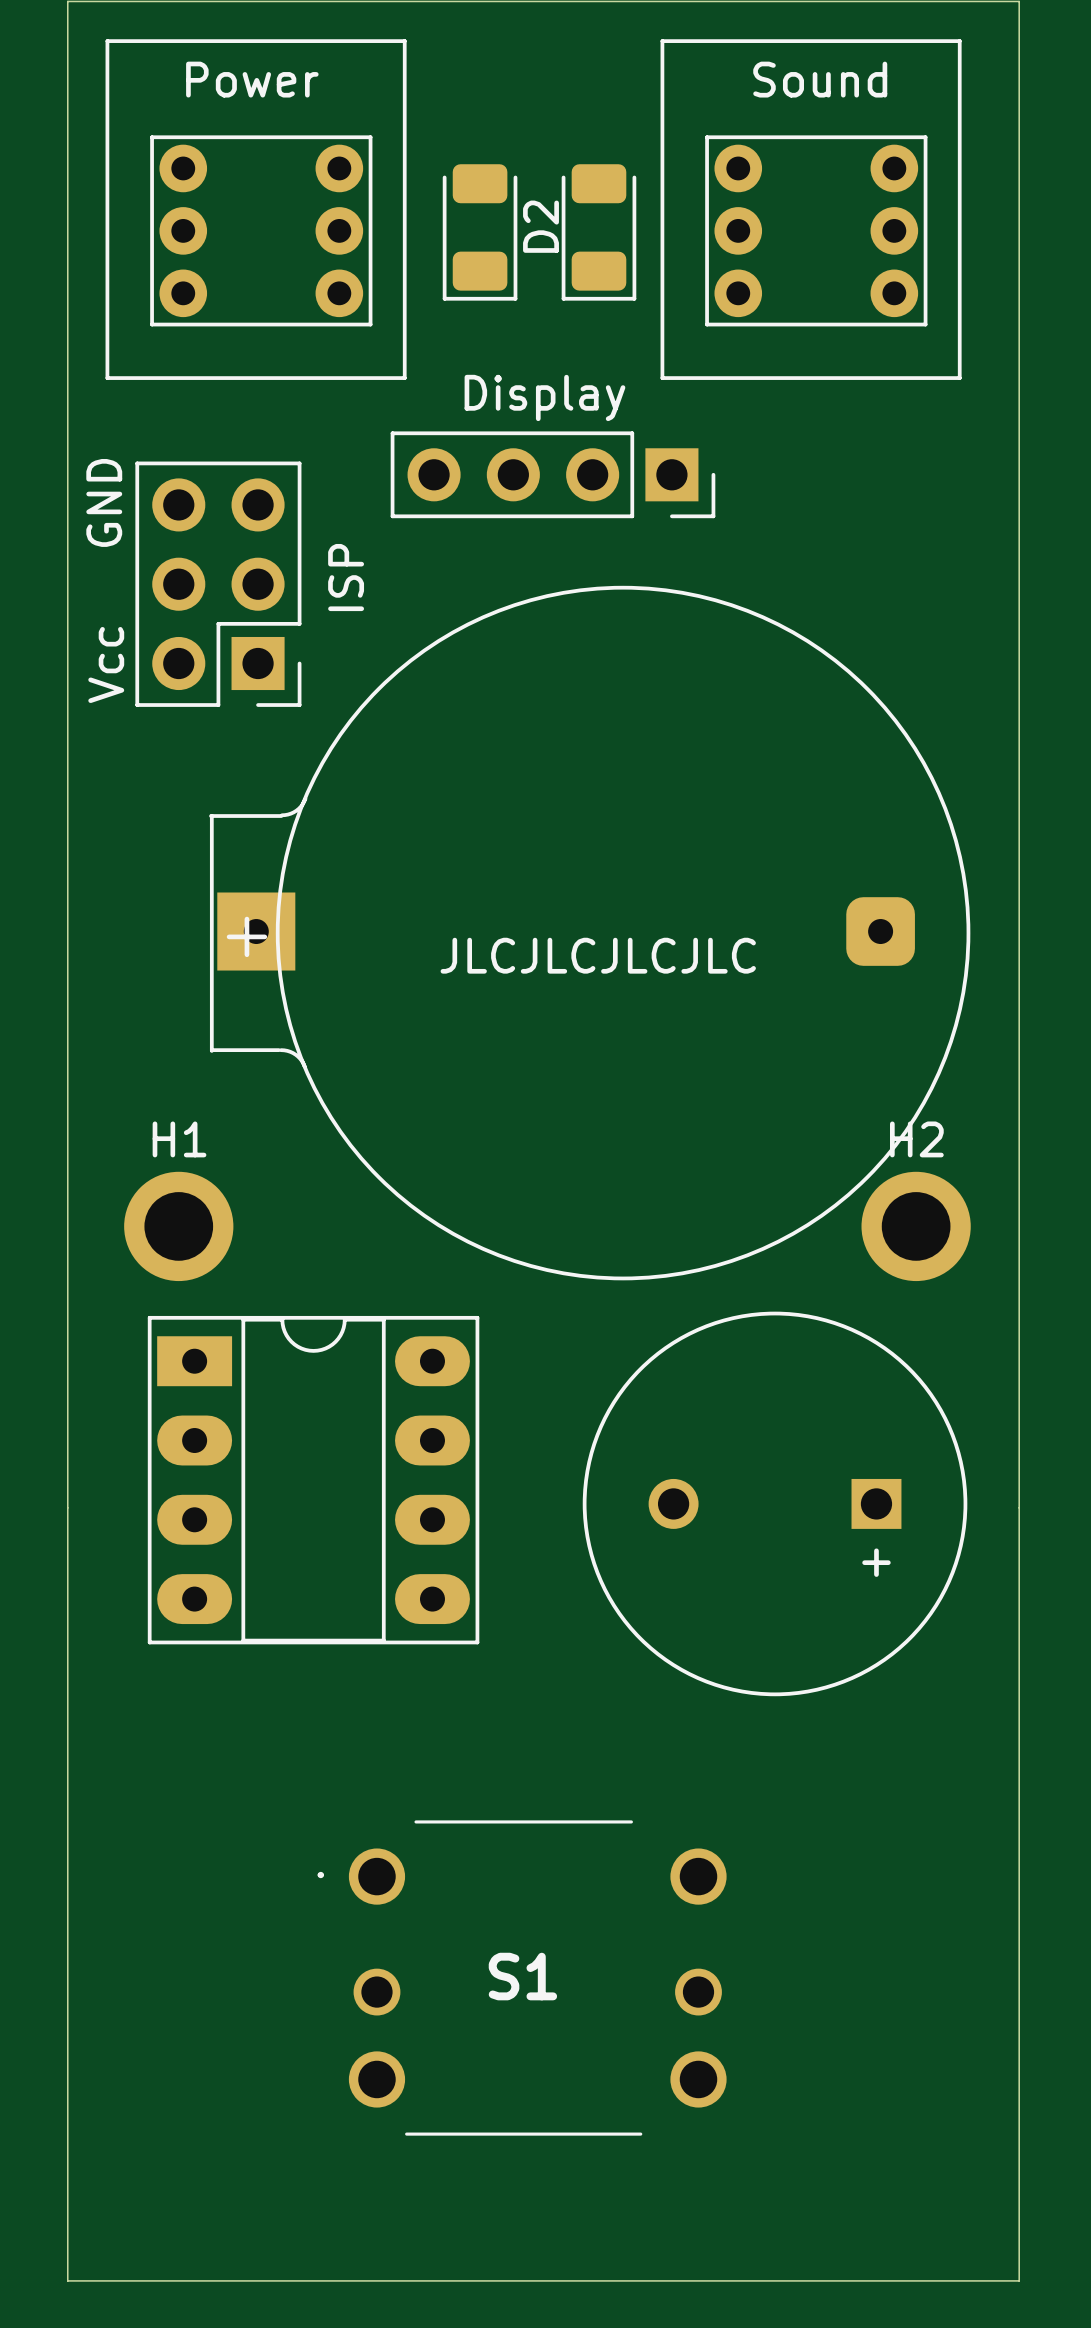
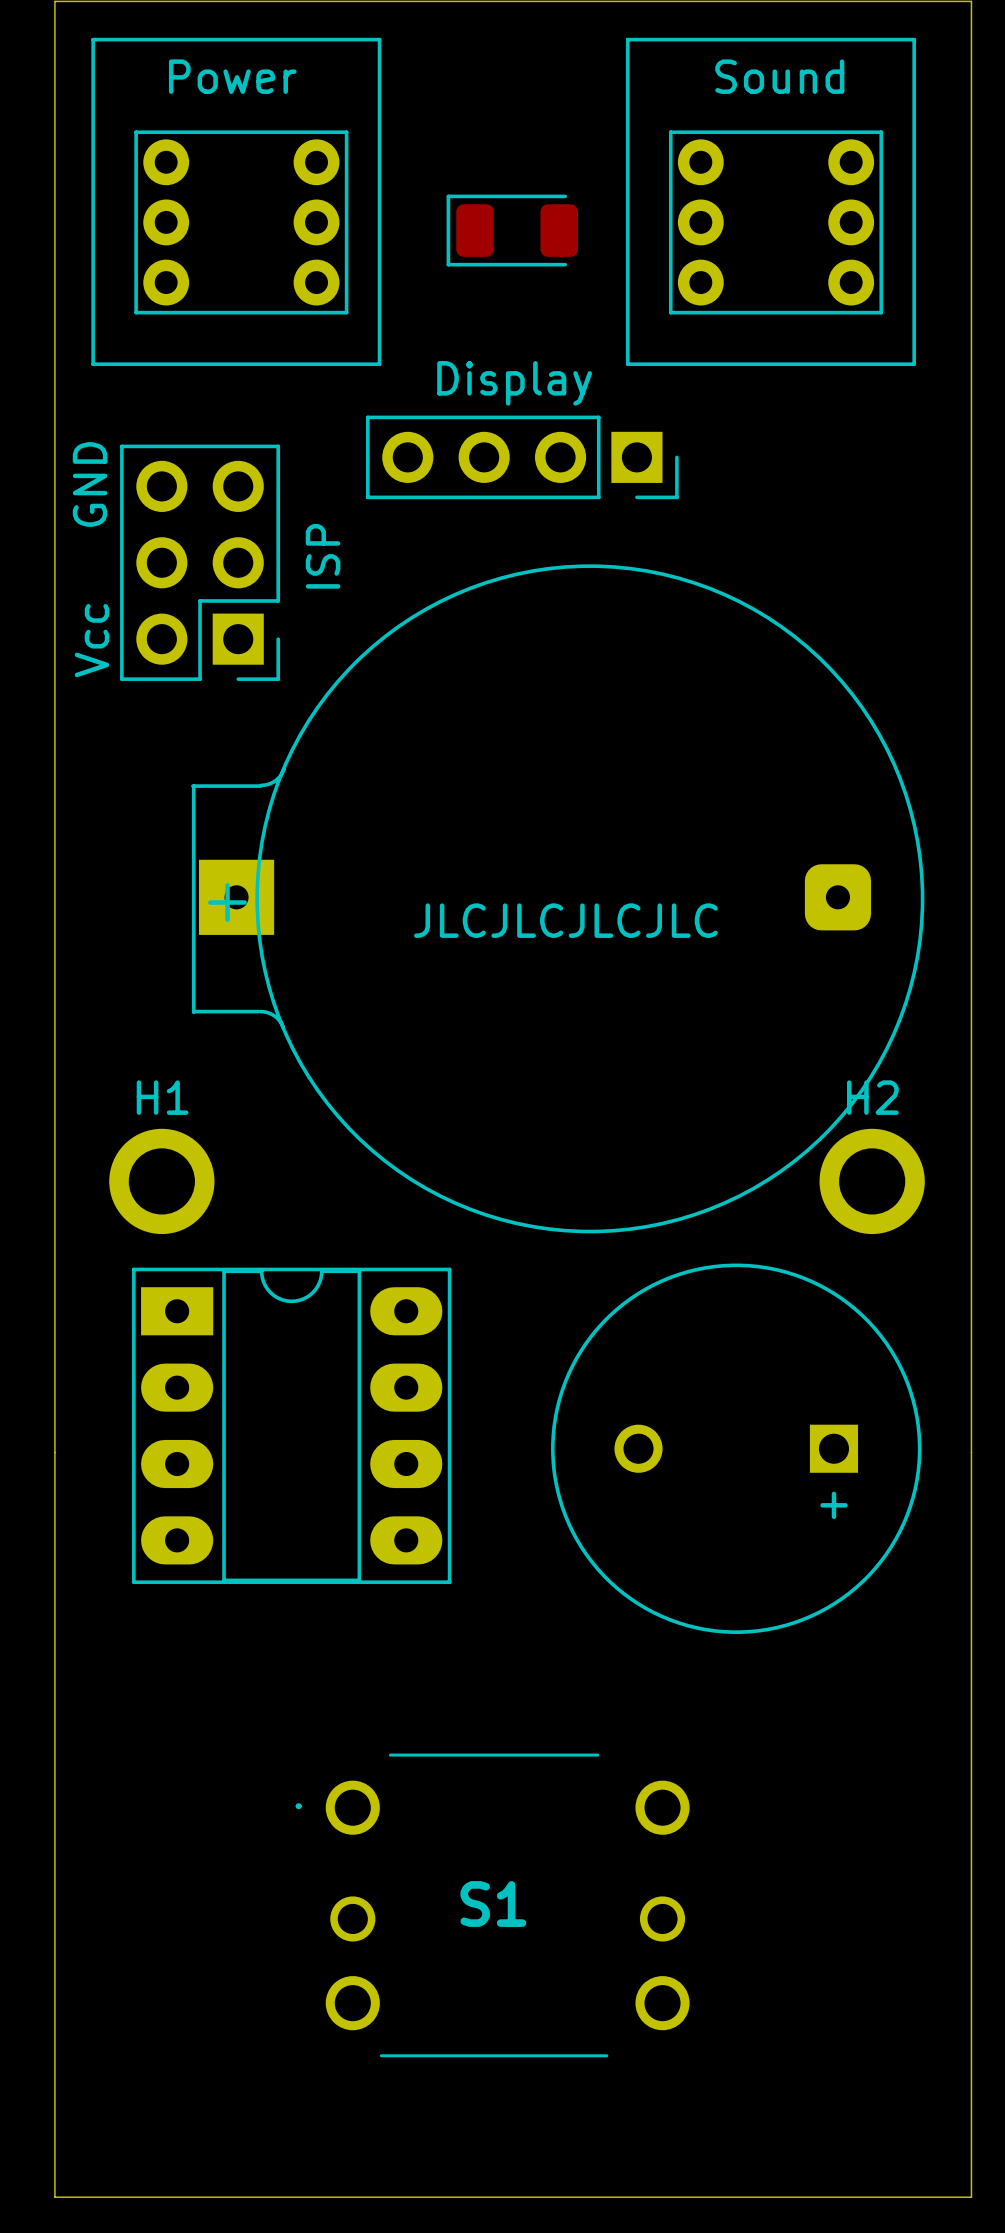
part rotation: 0° (480, 232) -> 90° clockwise (512, 230)
D2: (598, 232) -> none

